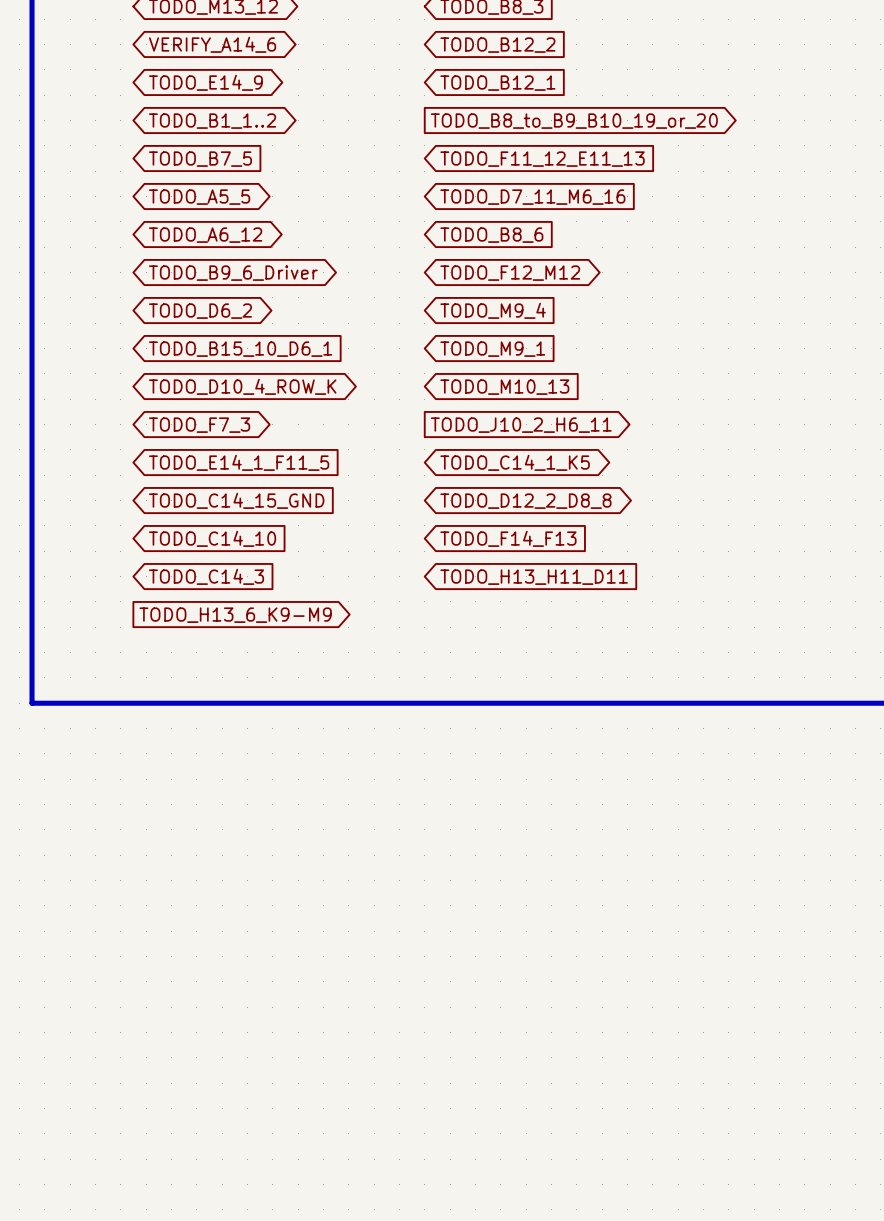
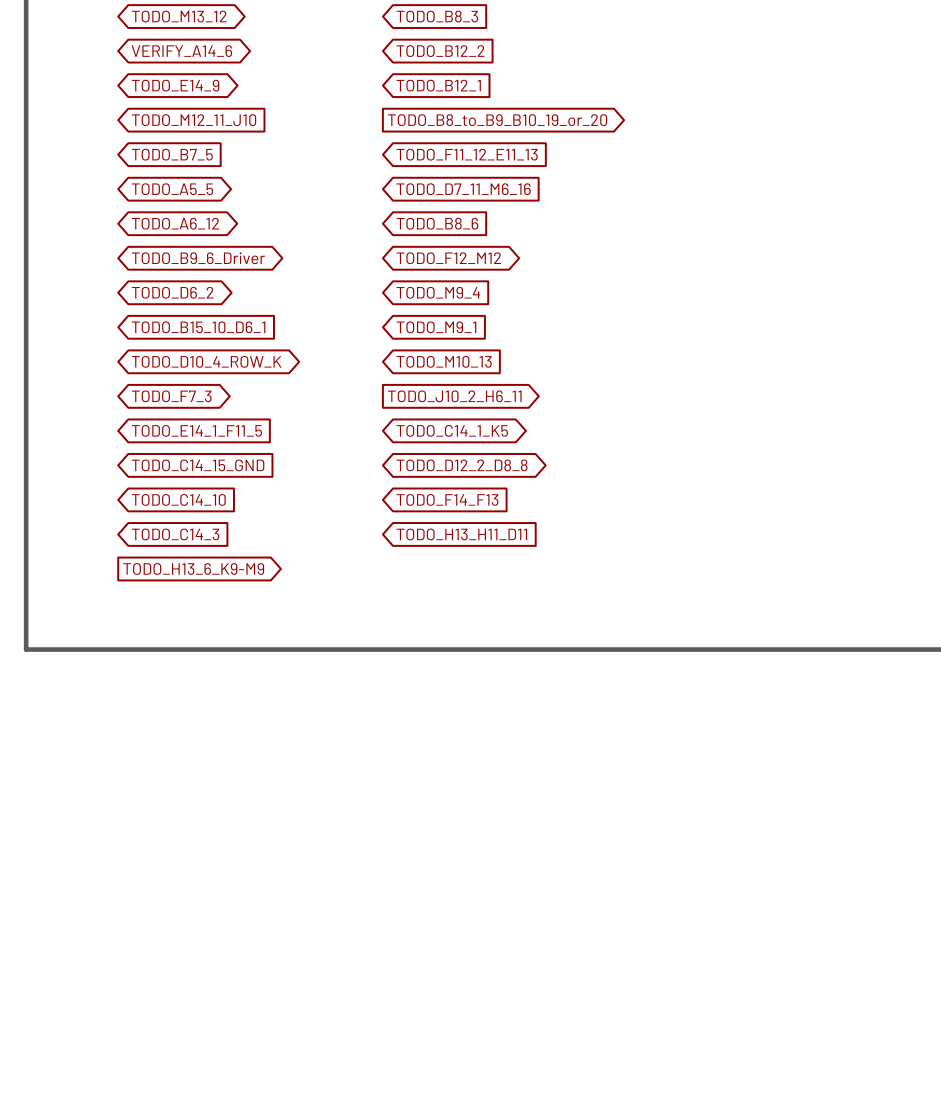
global label shape: bidirectional (212, 121) -> input (194, 120)
global label: TODO_B1_1..2 (212, 121) -> TODO_M12_11_J10 (194, 120)

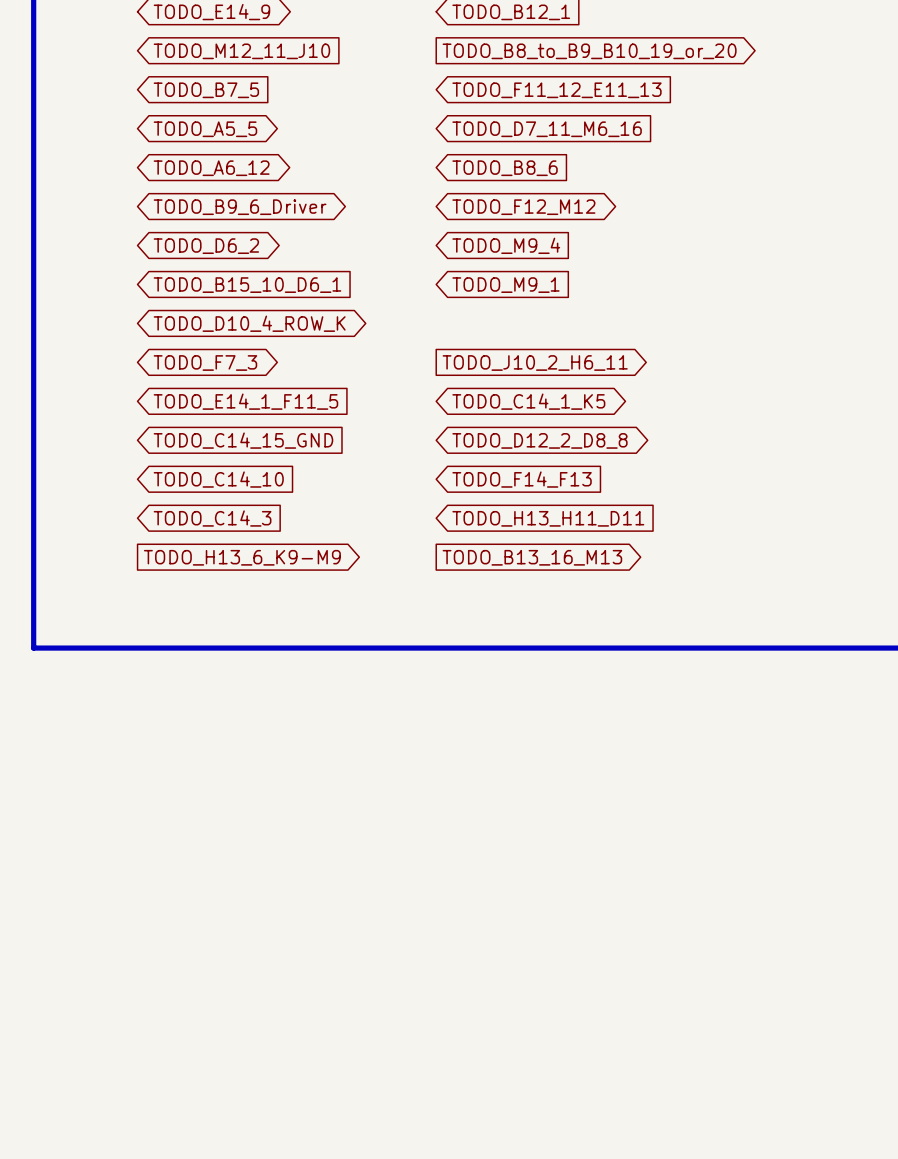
global label: TODO_M10_13 (444, 361) -> none
global label: none -> TODO_B13_16_M13 (532, 557)

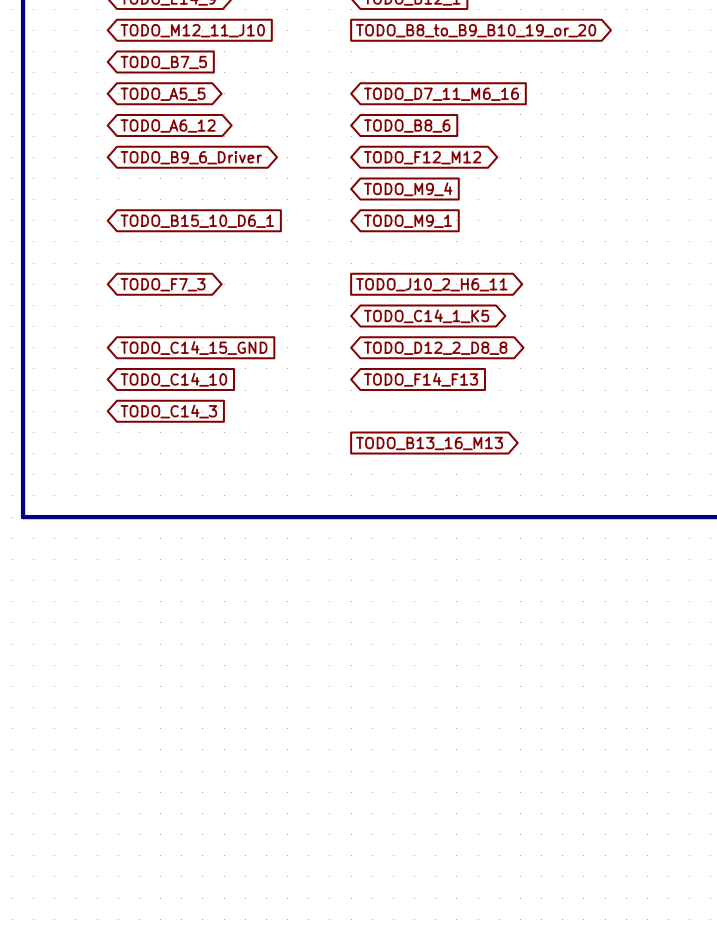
global label: TODO_F11_12_E11_13 (556, 90) -> none
global label: TODO_D6_2 (206, 246) -> none
global label: TODO_D10_4_ROW_K (249, 323) -> none
global label: TODO_E14_1_F11_5 (245, 401) -> none
global label: TODO_H13_H11_D11 (548, 518) -> none
global label: TODO_H13_6_K9-M9 (242, 557) -> none

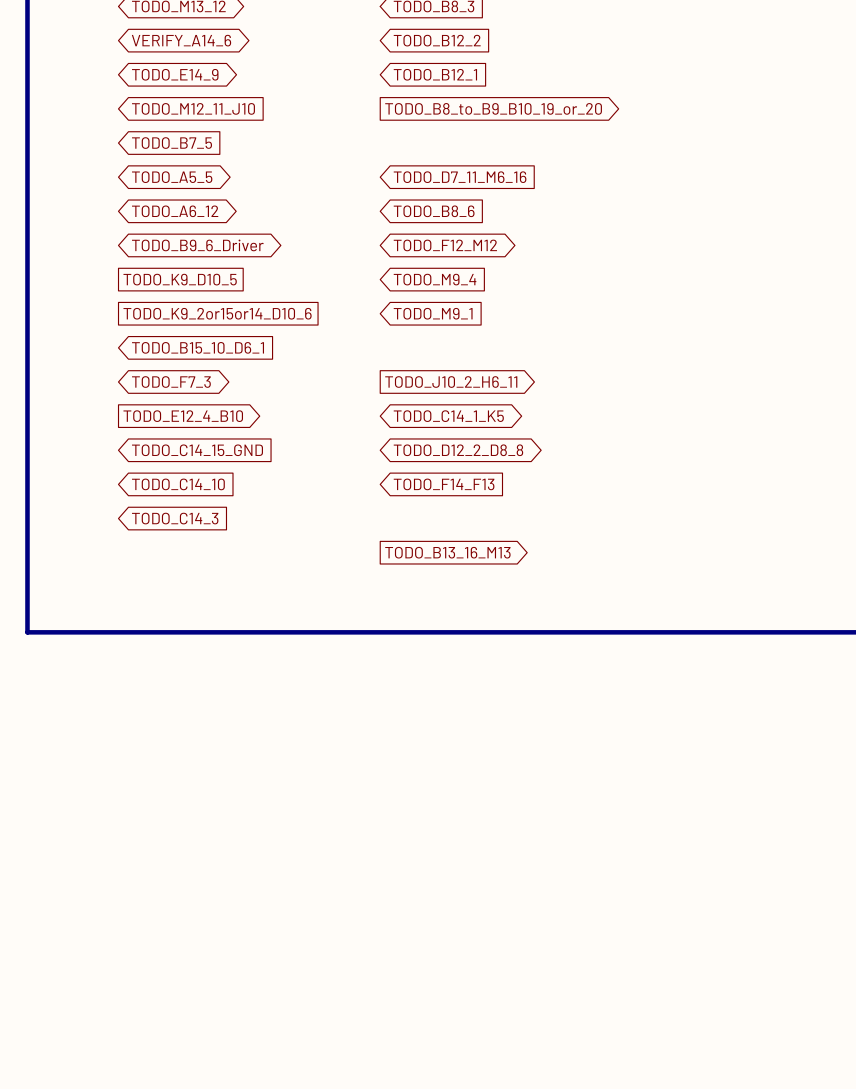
global label: none -> TODO_K9_D10_5 (180, 279)
global label shape: input (197, 221) -> passive (217, 313)
global label: TODO_B15_10_D6_1 (197, 221) -> TODO_K9_2or15or14_D10_6 (217, 313)
global label: none -> TODO_B15_10_D6_1 (198, 347)
global label: none -> TODO_E12_4_B10 (183, 416)

